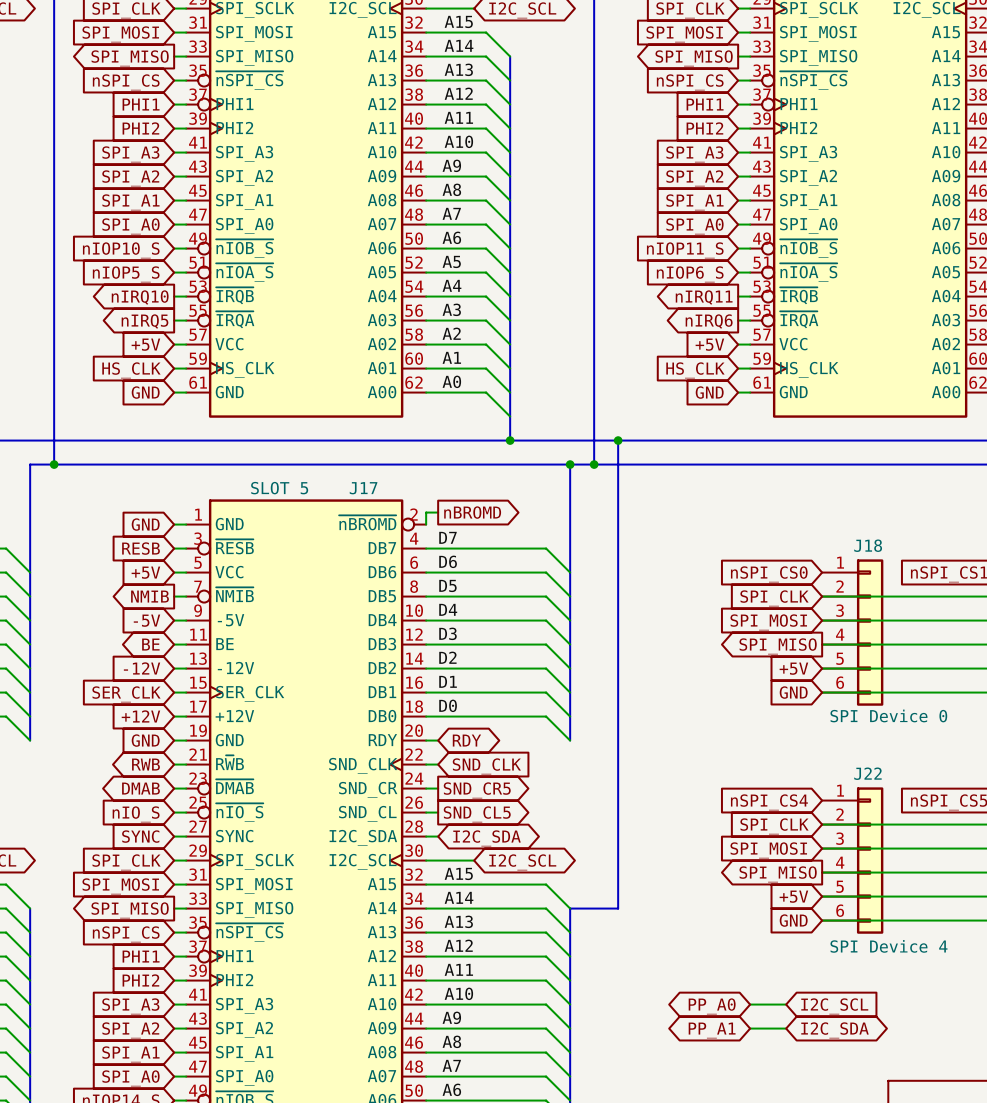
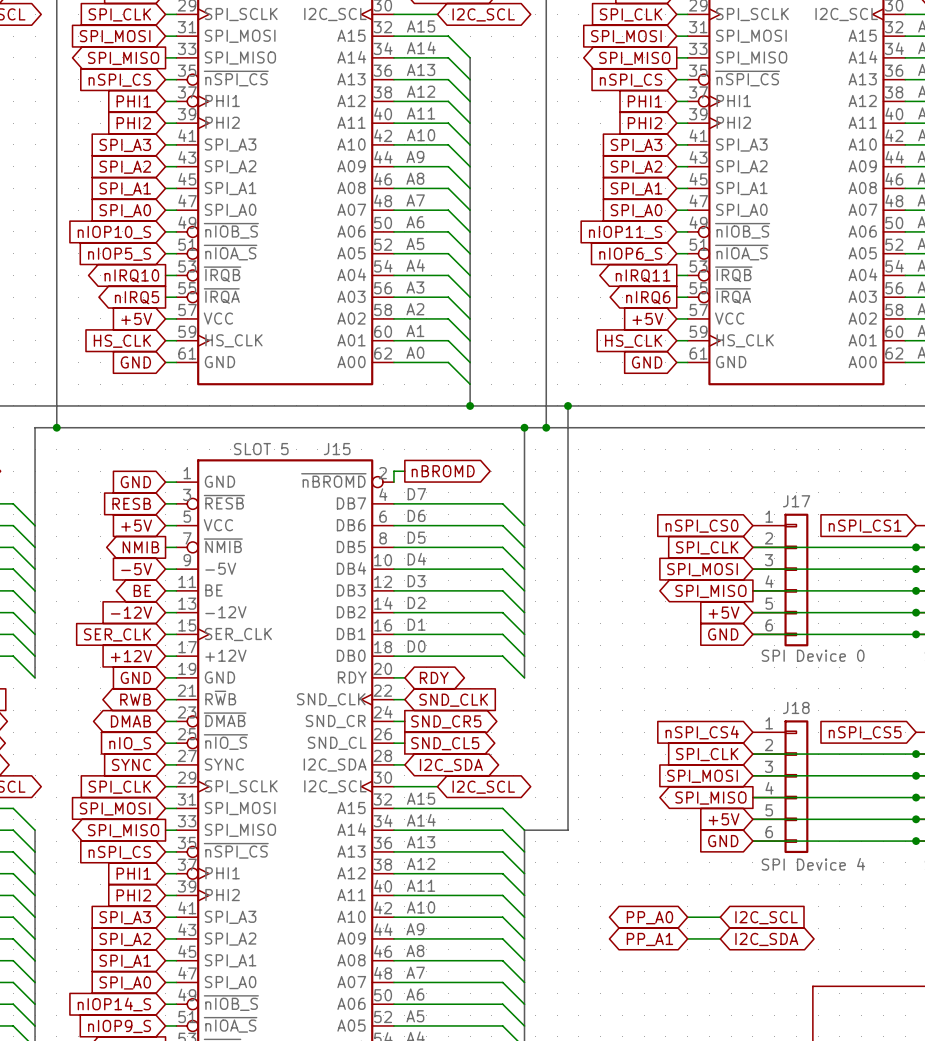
J17 name: J17 (363, 488) -> J15 (337, 449)
J18 name: J18 (868, 545) -> J17 (796, 501)
J22 name: J22 (867, 773) -> J18 (796, 707)

